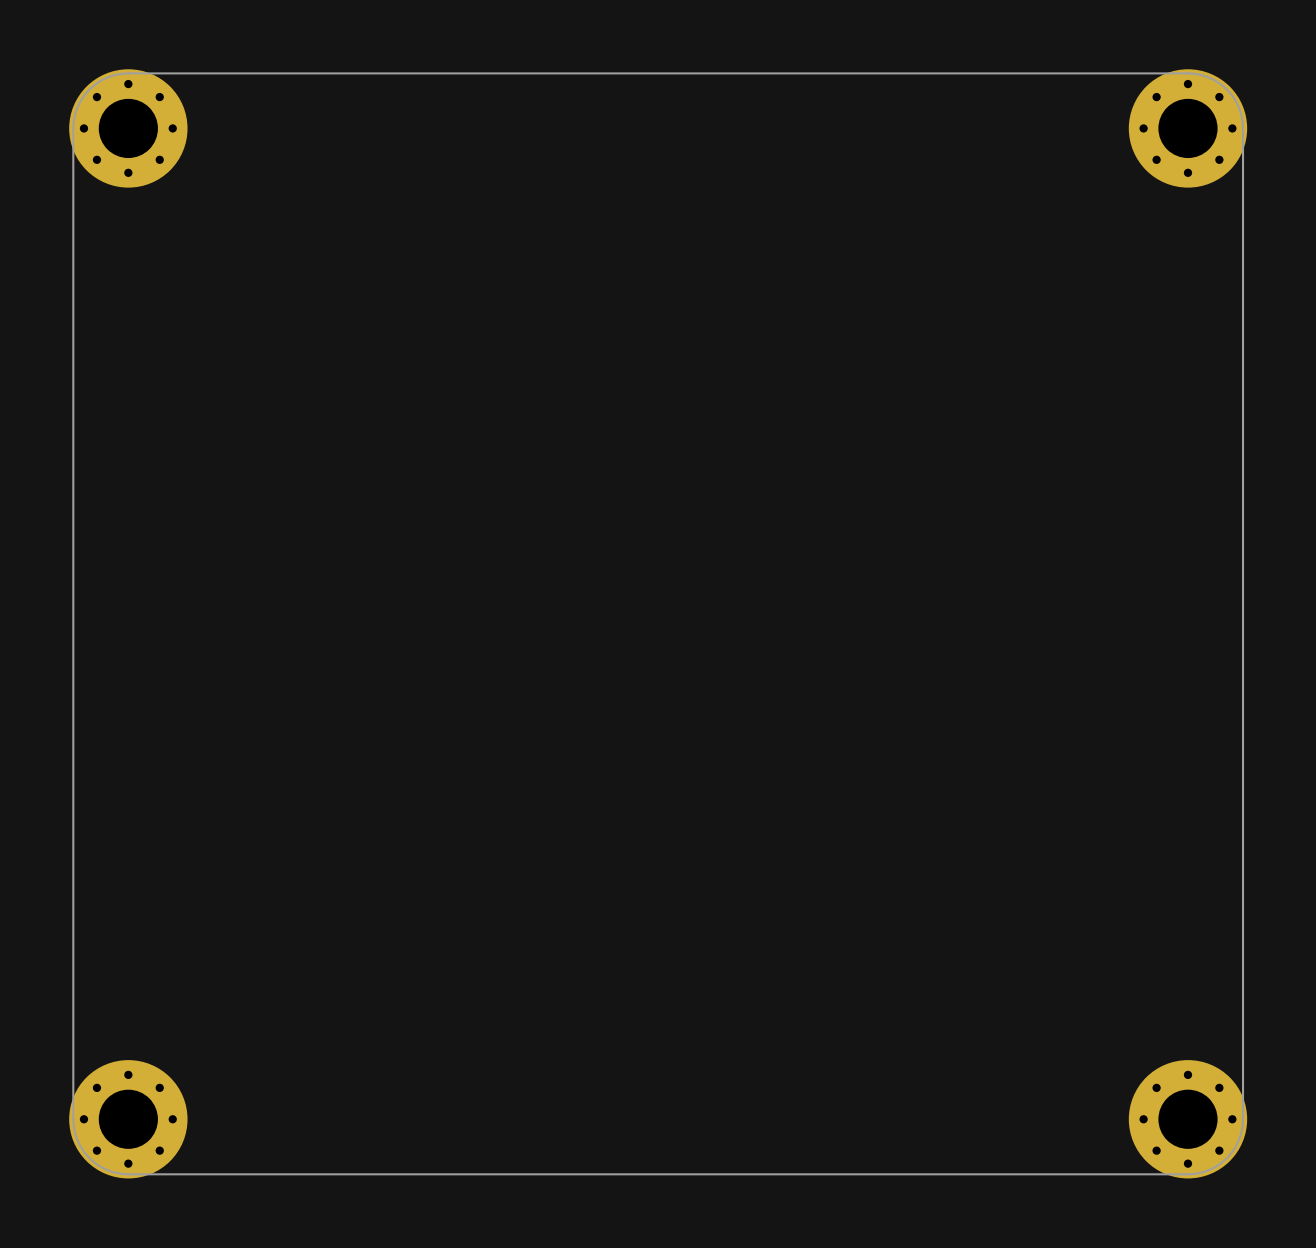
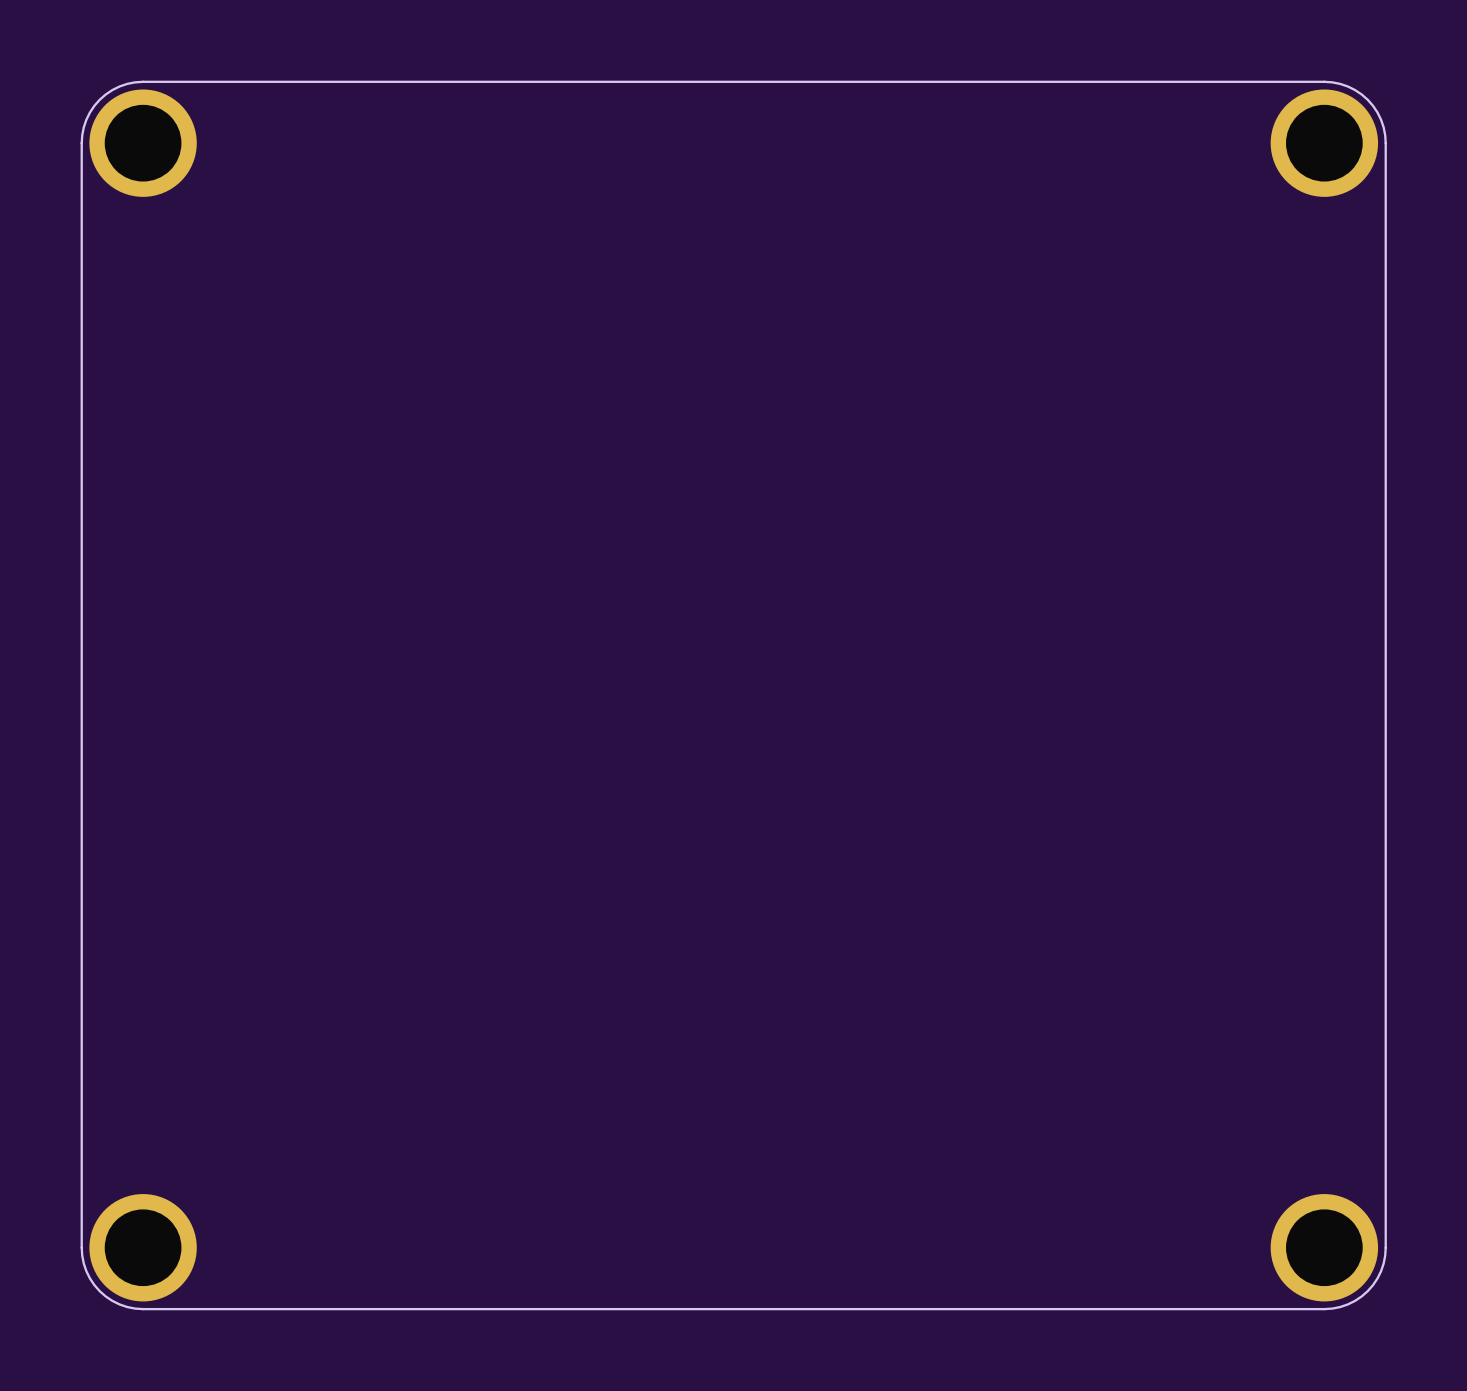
part footprint: [69, 69, 188, 188] -> [89, 89, 197, 197]
part footprint: [1128, 69, 1248, 188] -> [1270, 89, 1379, 197]
part footprint: [69, 1060, 188, 1179] -> [89, 1194, 197, 1302]
part footprint: [1128, 1060, 1248, 1179] -> [1270, 1194, 1379, 1302]

